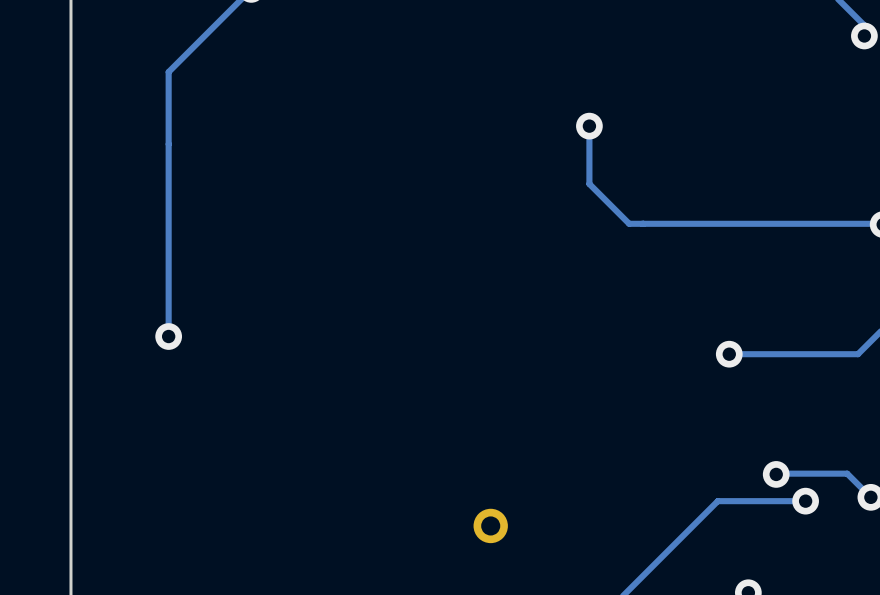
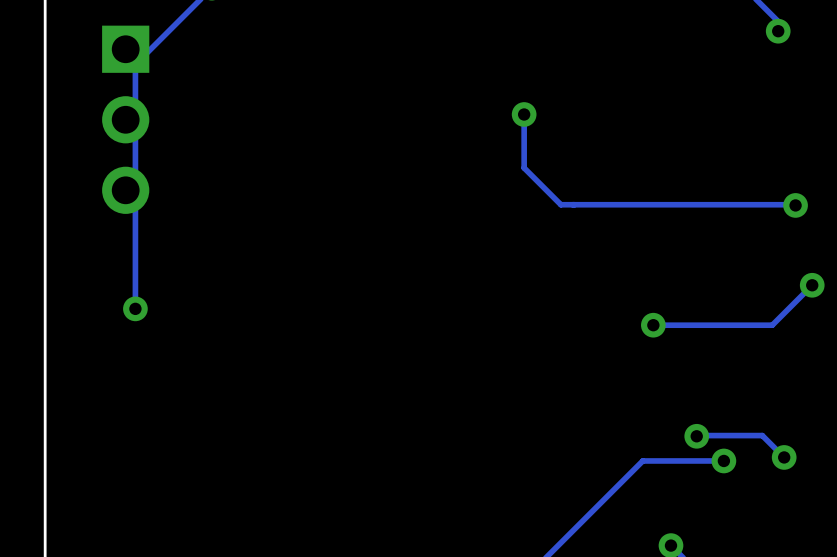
part: none -> (125, 119)
part: (490, 525) -> none

